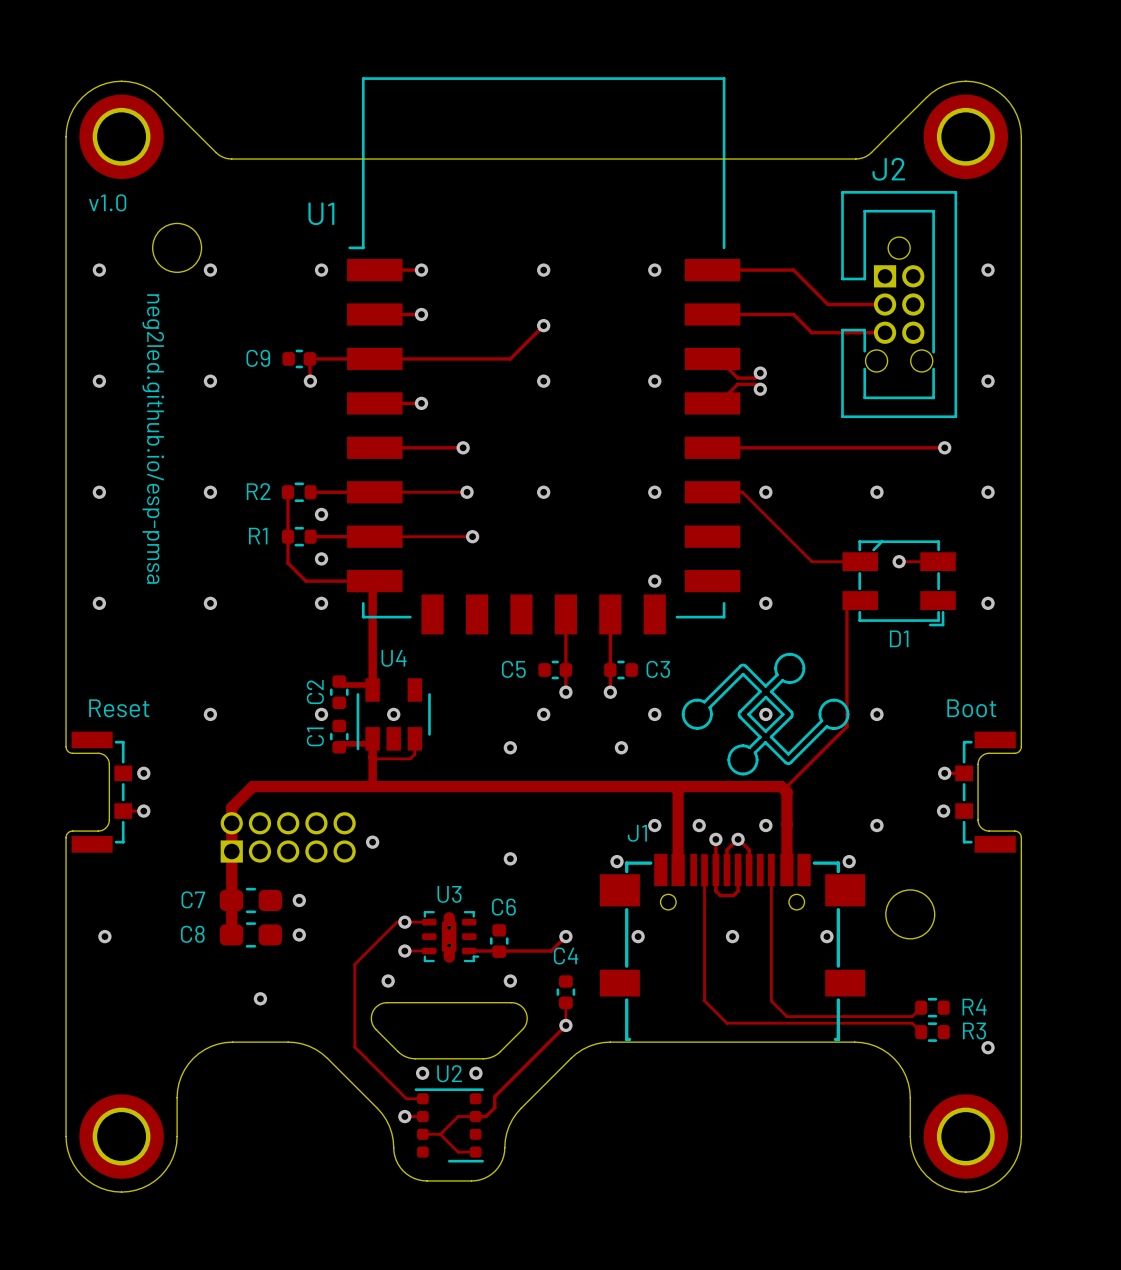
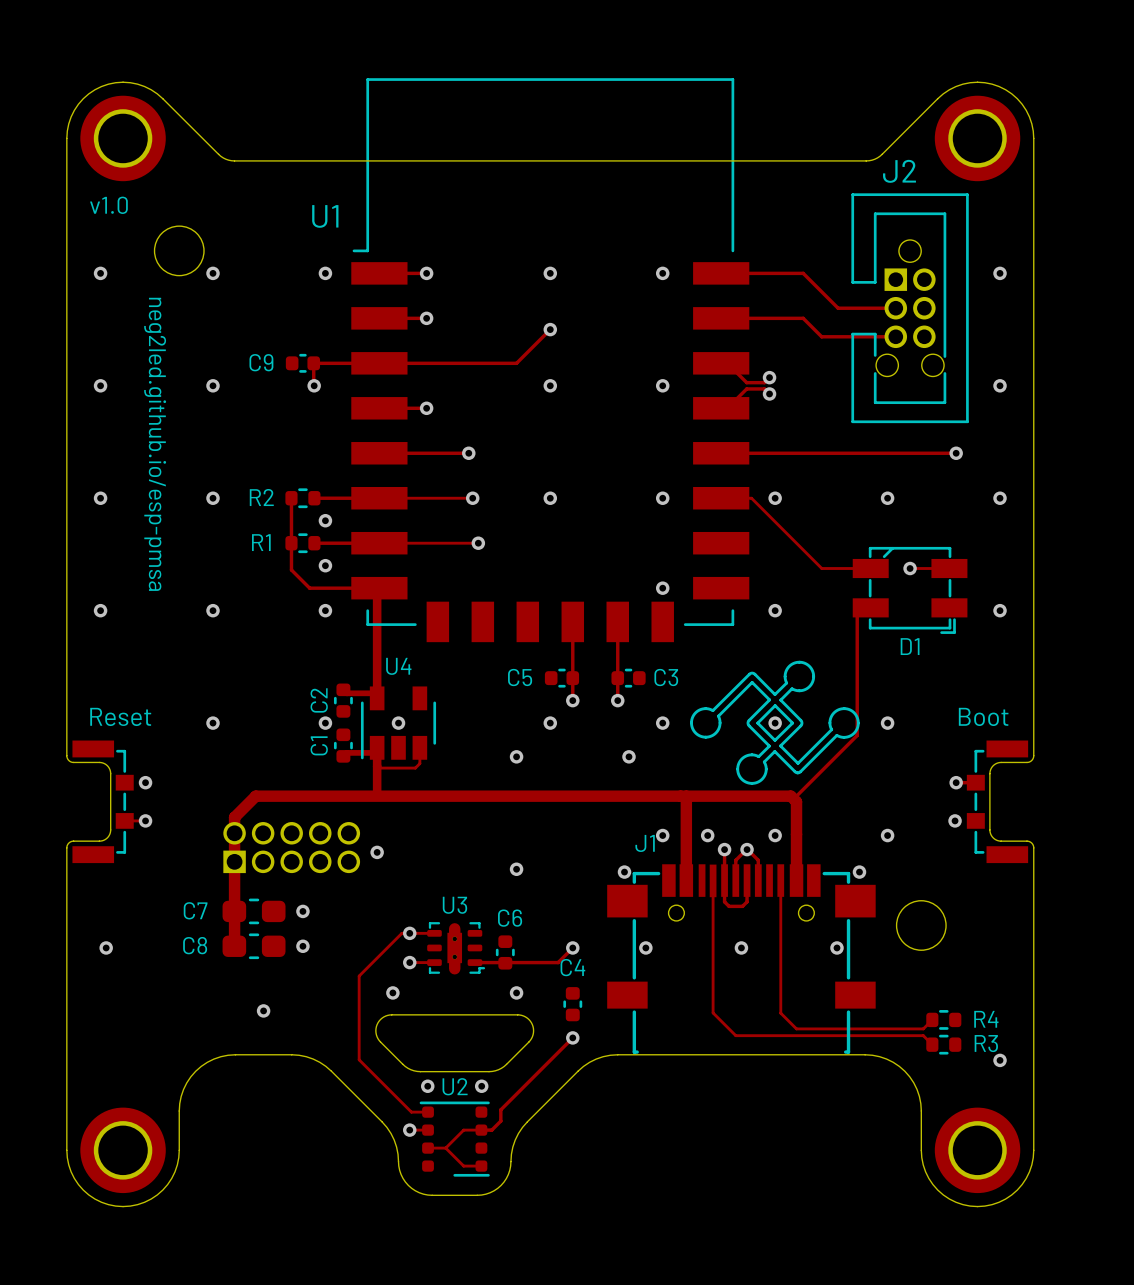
track: (565, 1002) (565, 1025) -> none

